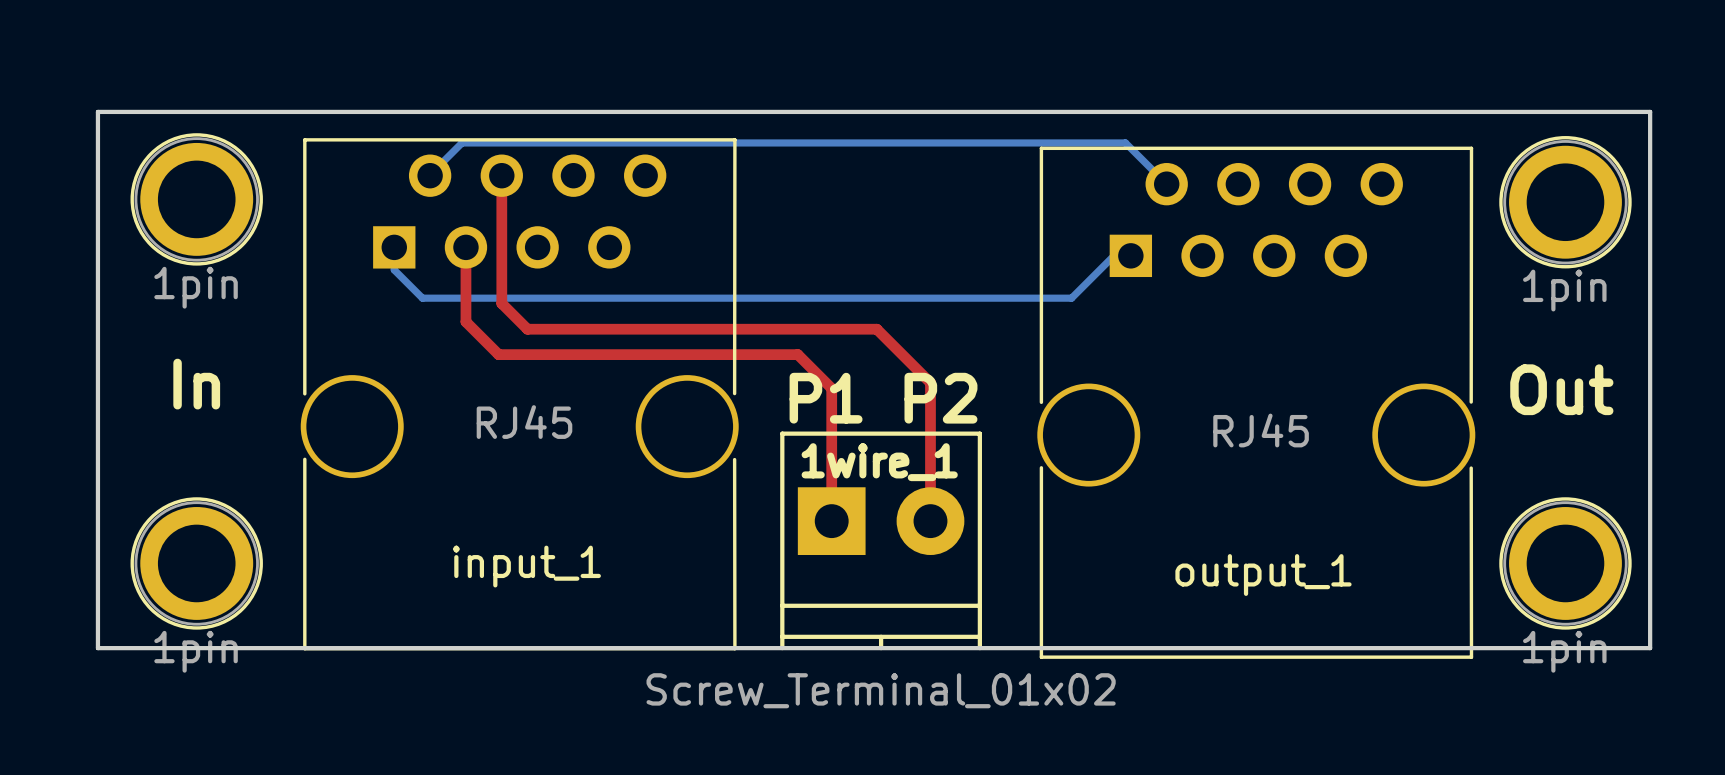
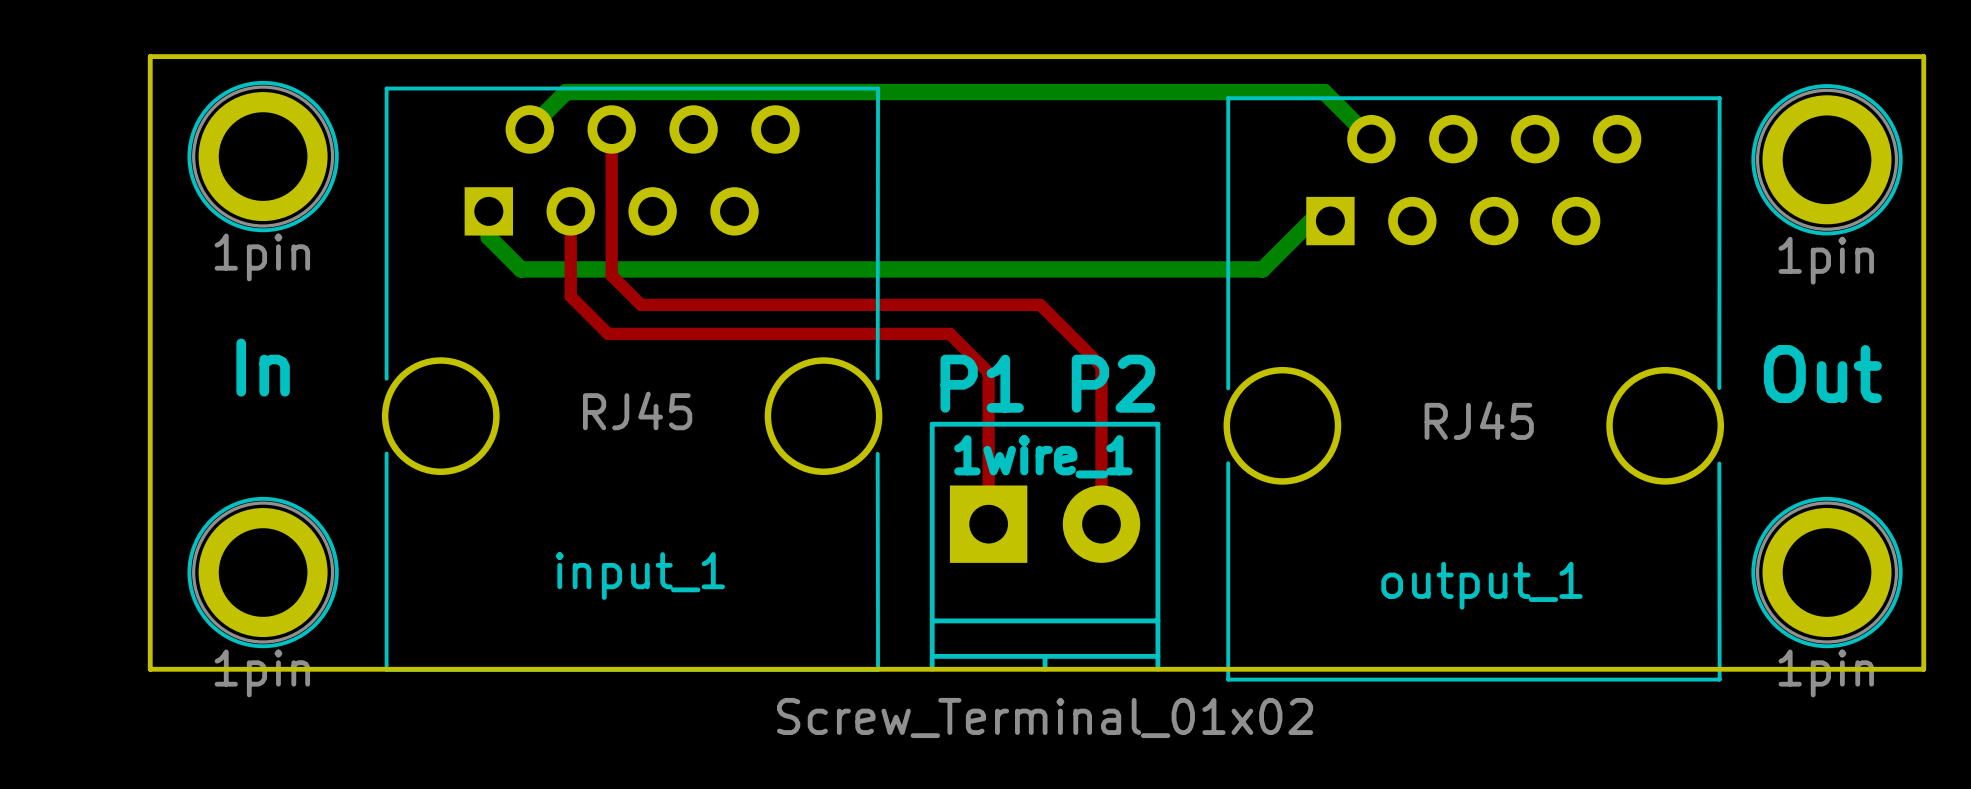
bottom track width: thin (432, 175) (430, 174) (462, 142) (1125, 142) (1158, 175) -> thick (532, 129) (529, 128) (566, 92) (1324, 92) (1361, 129)
bottom track width: thin (394, 247) (394, 269) (422, 298) (1071, 298) (1122, 247) -> thick (488, 211) (488, 237) (521, 269) (1262, 269) (1320, 211)

